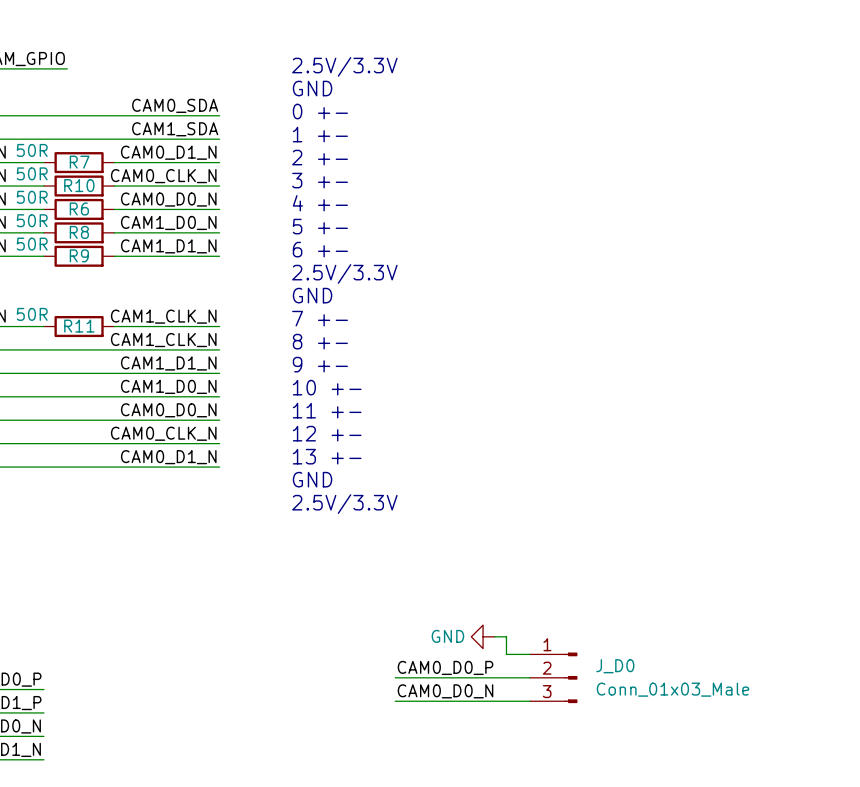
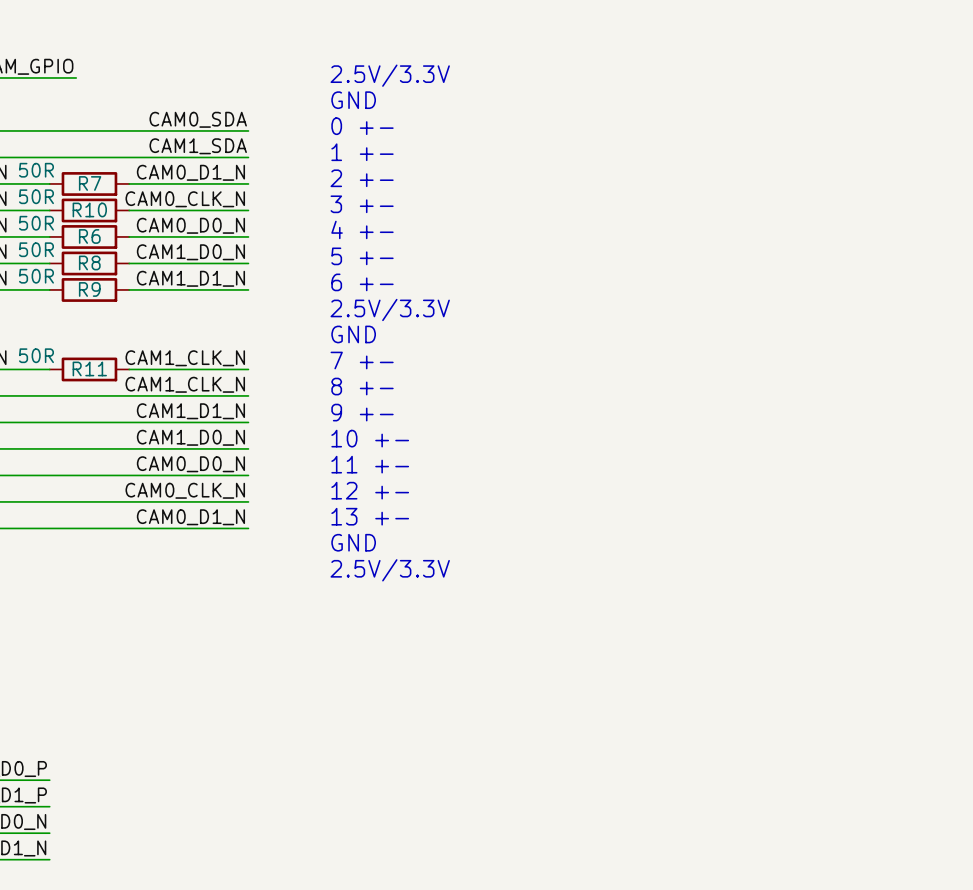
power symbol: GND (483, 636) -> none
wire: (494, 636) (506, 636) (506, 654) (529, 654) -> none
label: CAM0_D0_P (445, 667) -> none
wire: (395, 677) (529, 677) -> none
J_D0: Conn_01x03_Male (553, 677) -> none
label: CAM0_D0_N (445, 691) -> none
wire: (395, 701) (529, 701) -> none

